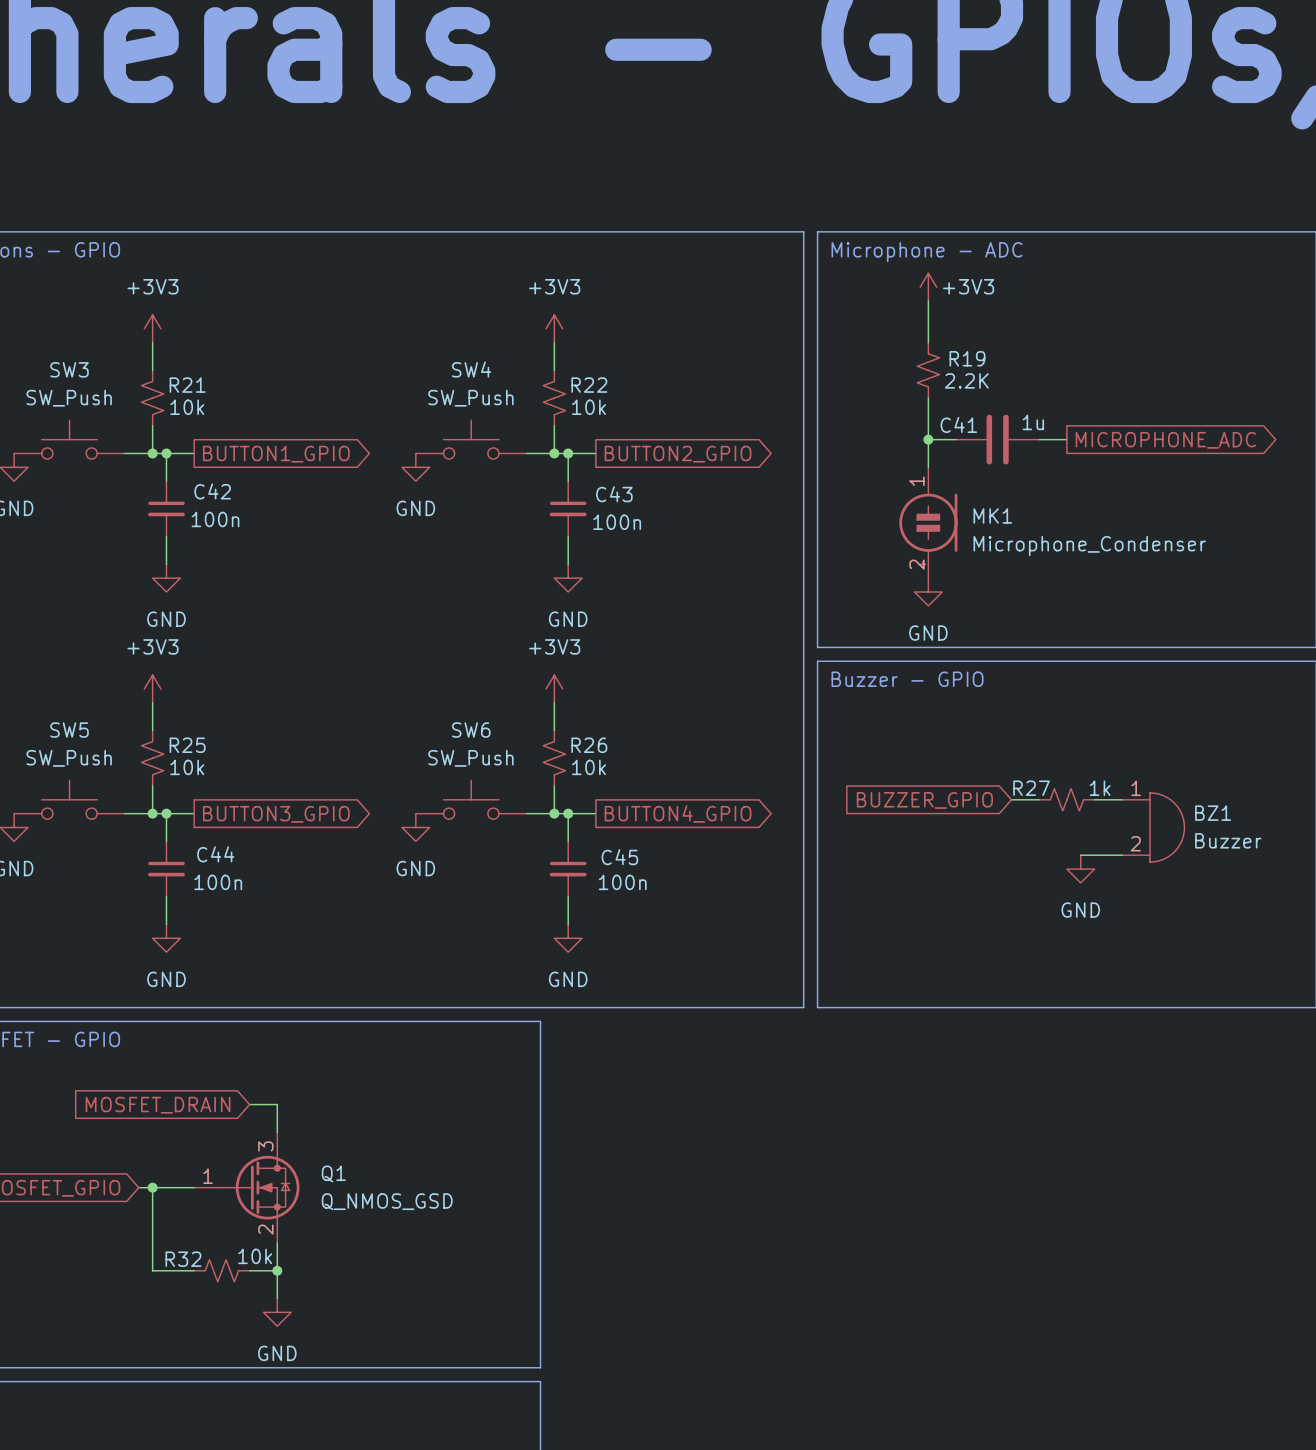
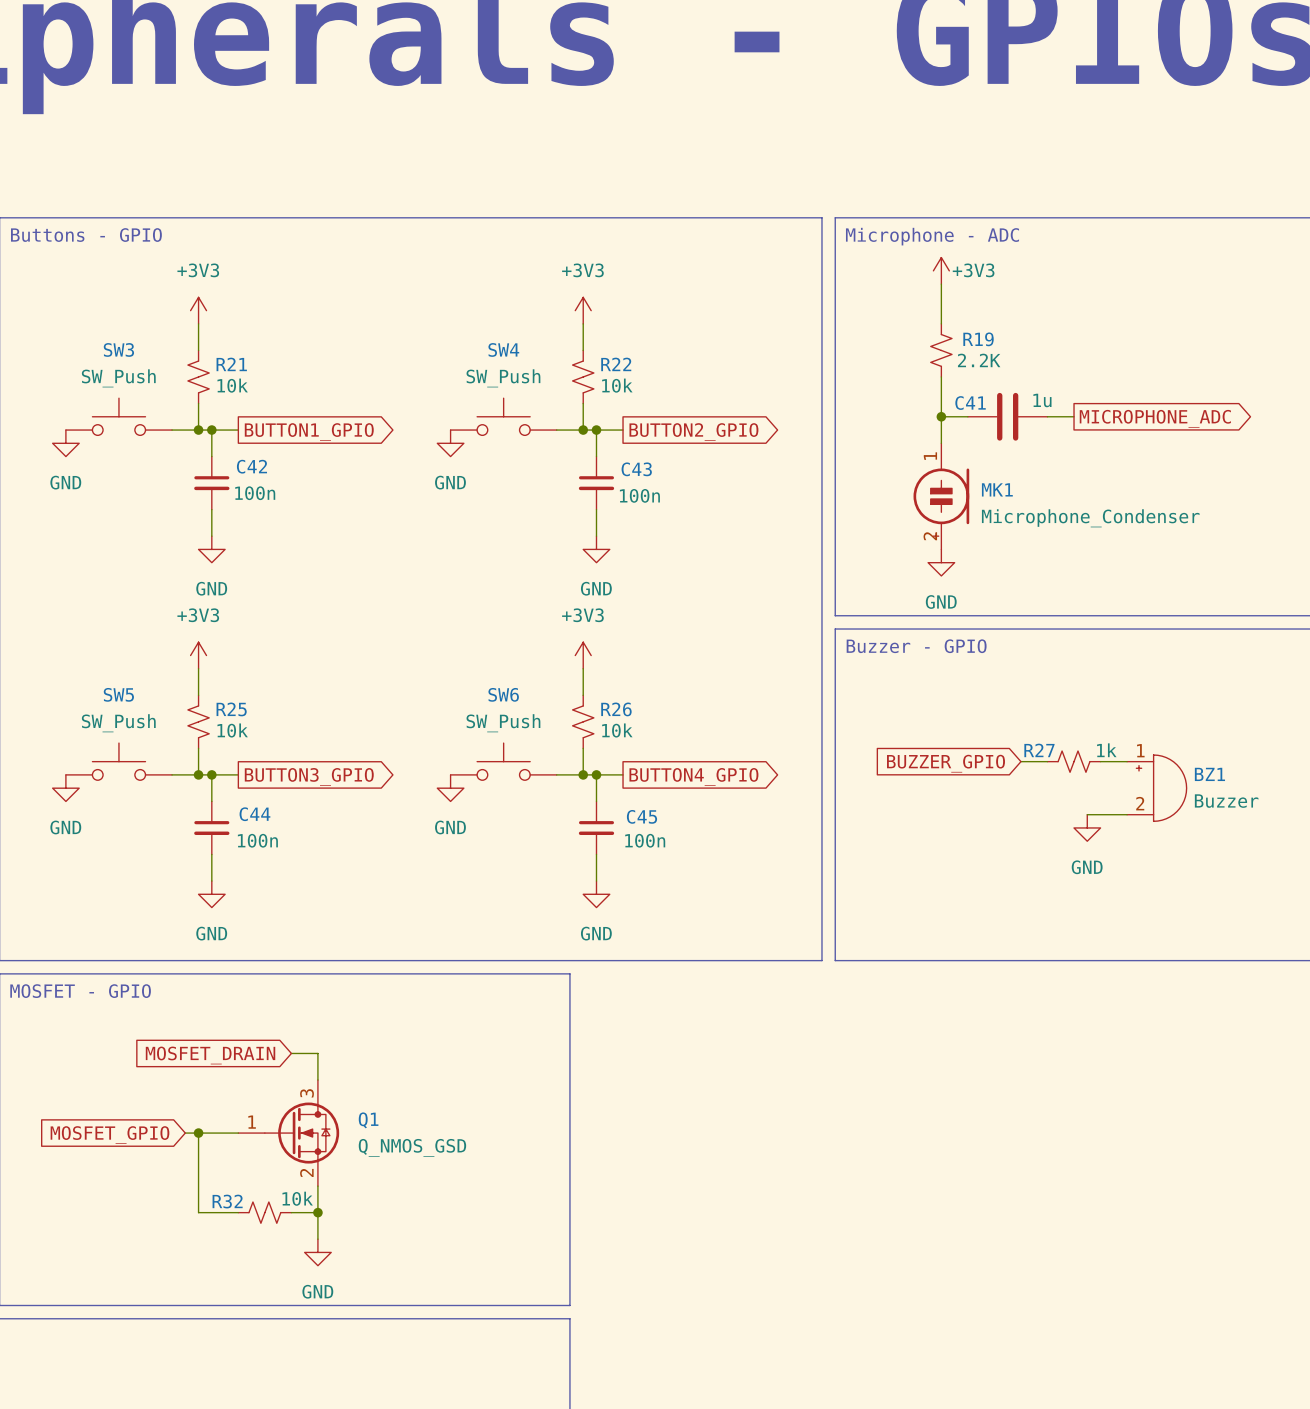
BZ1 symbol: [1122, 792, 1185, 863] -> [1127, 755, 1187, 822]

